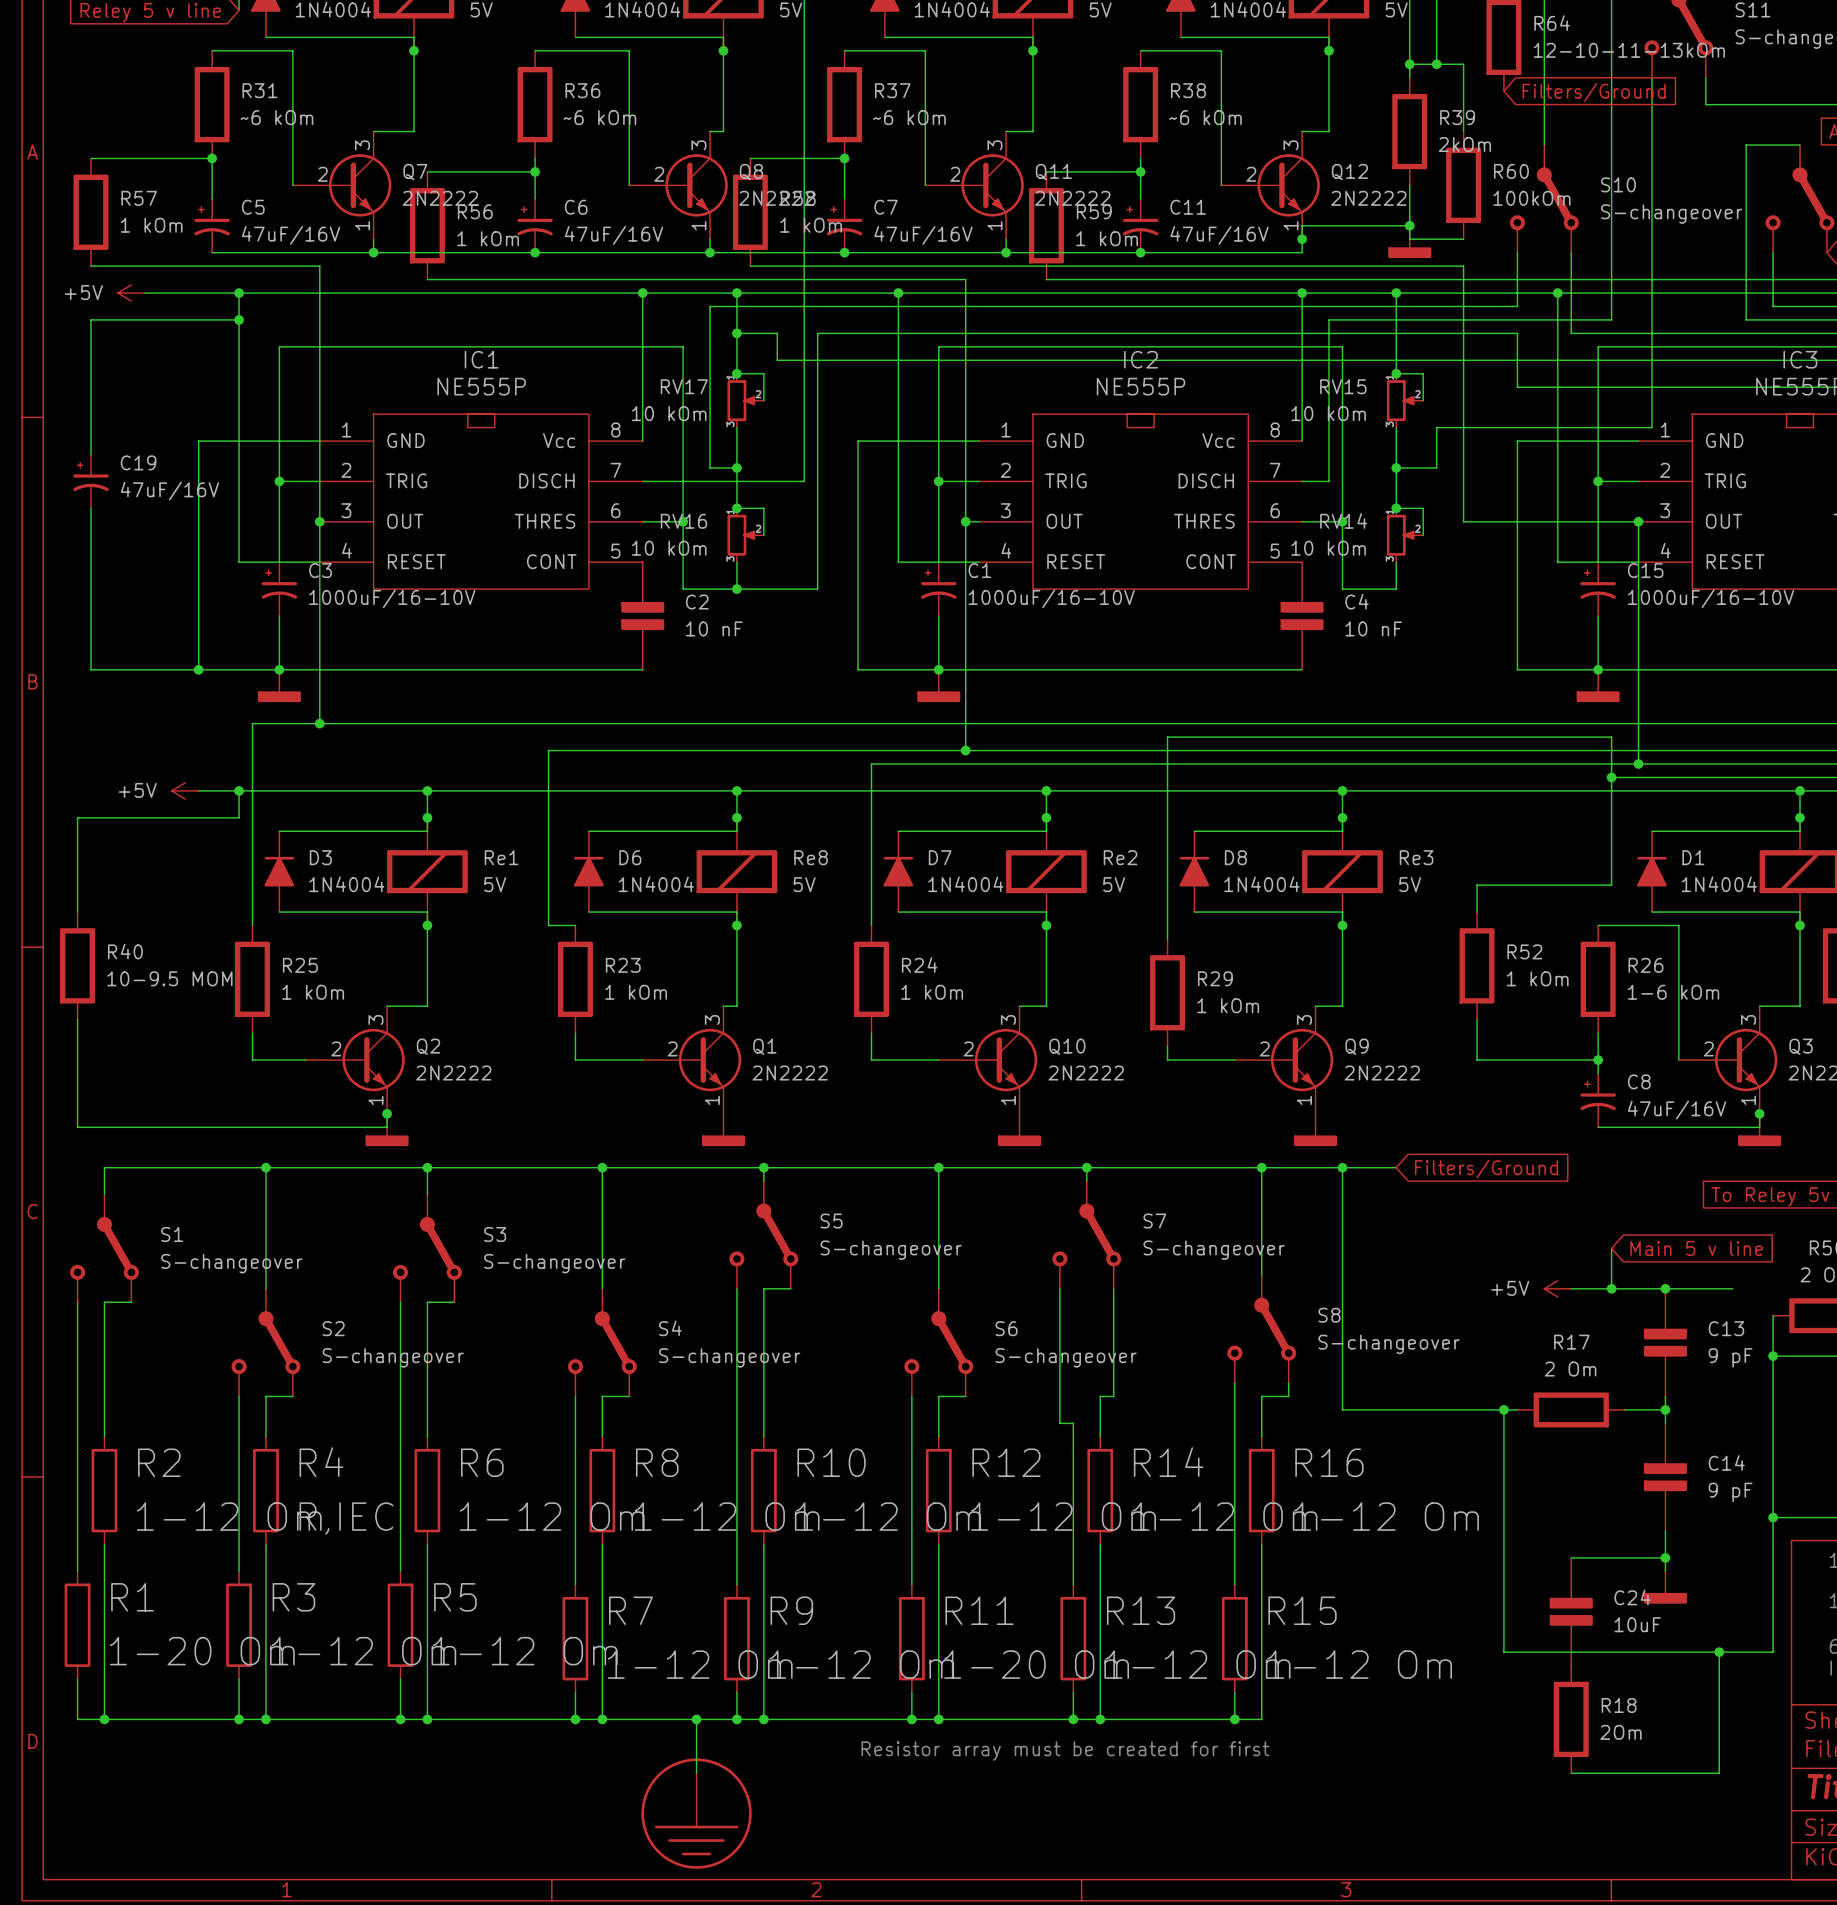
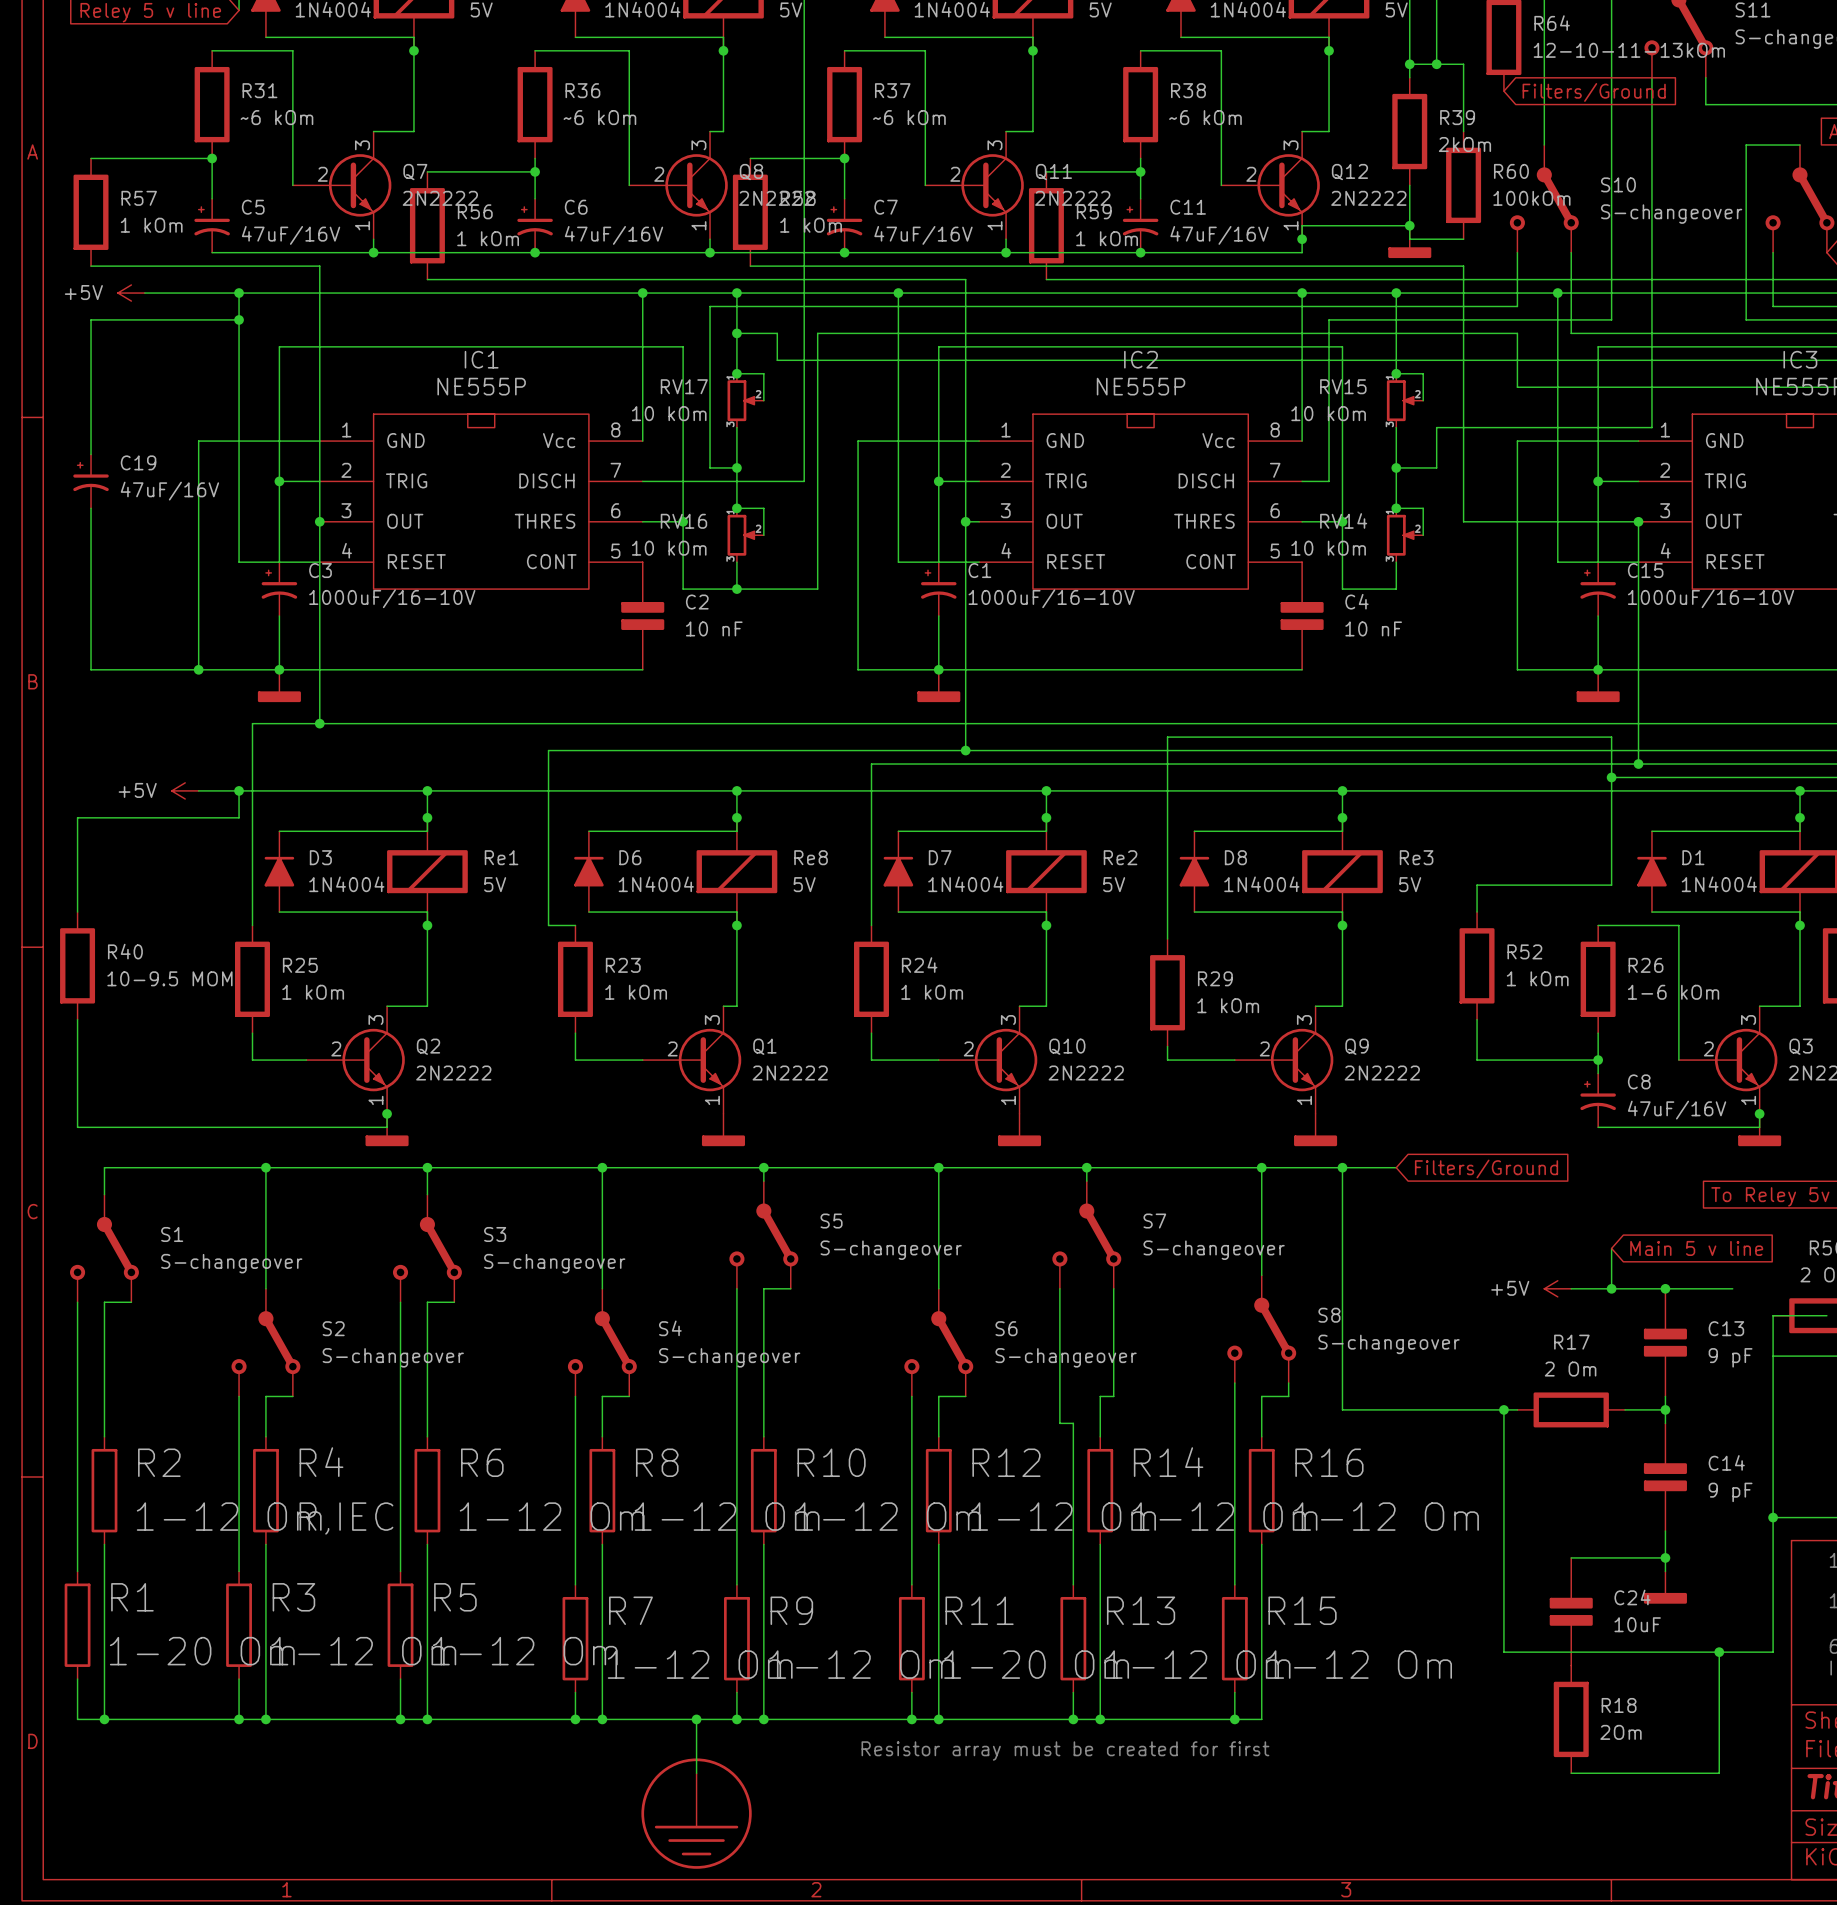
wire: none -> (1773, 1315) (1826, 1315)
junction: (1773, 1356) -> none

